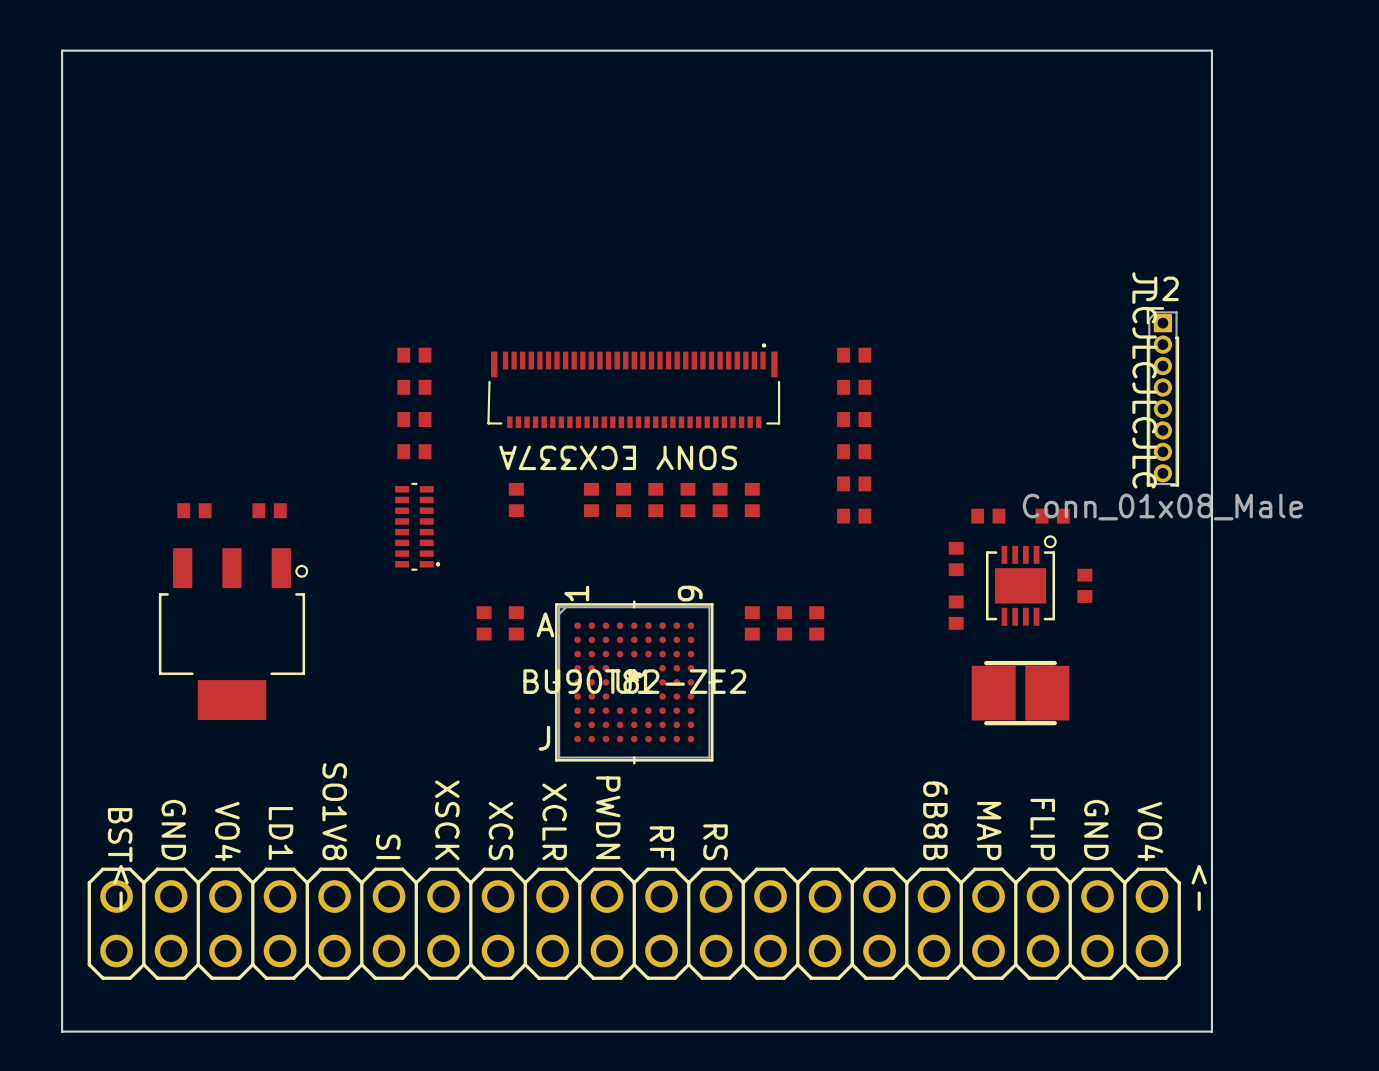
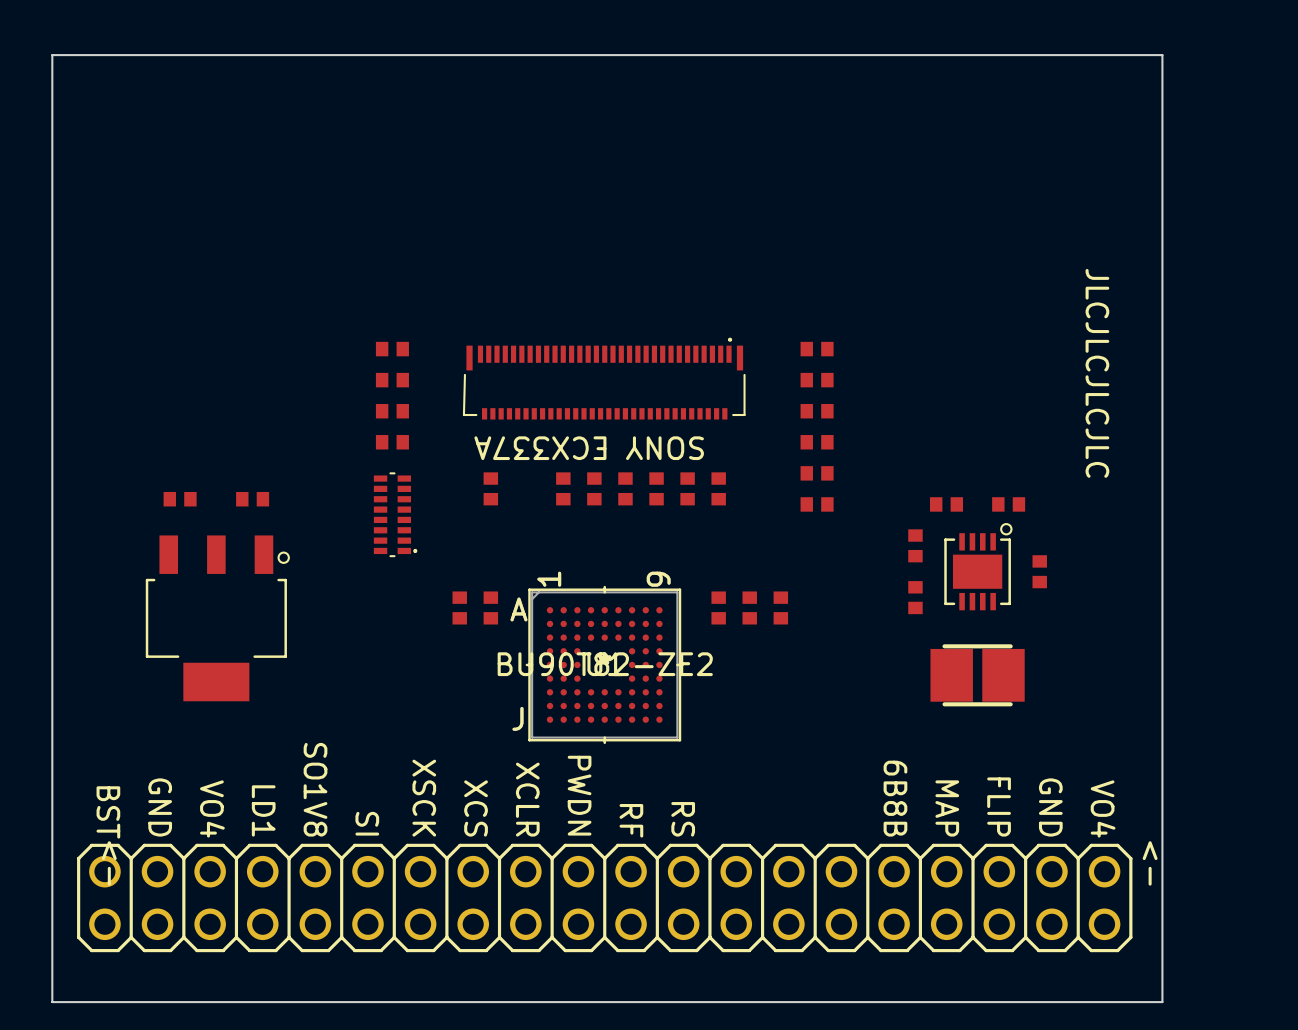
J2: Conn_01x08_Male (1162, 396) -> none

